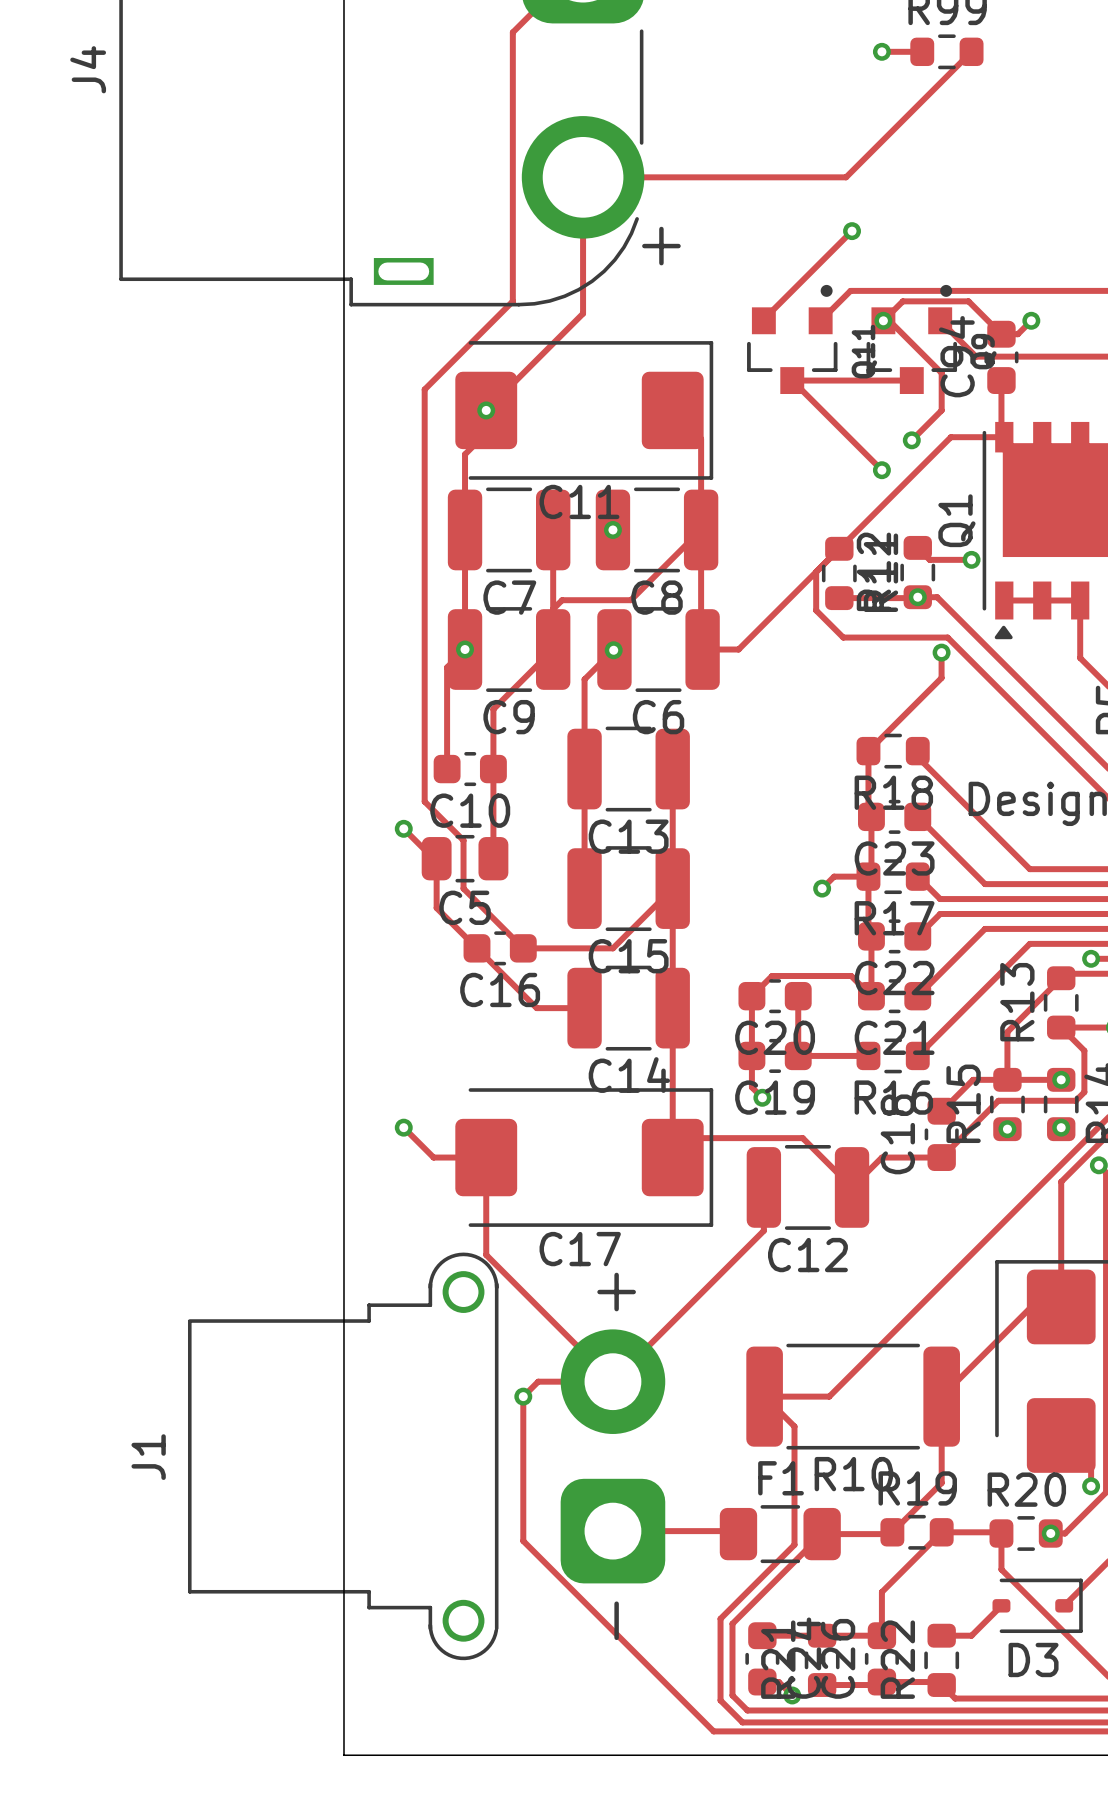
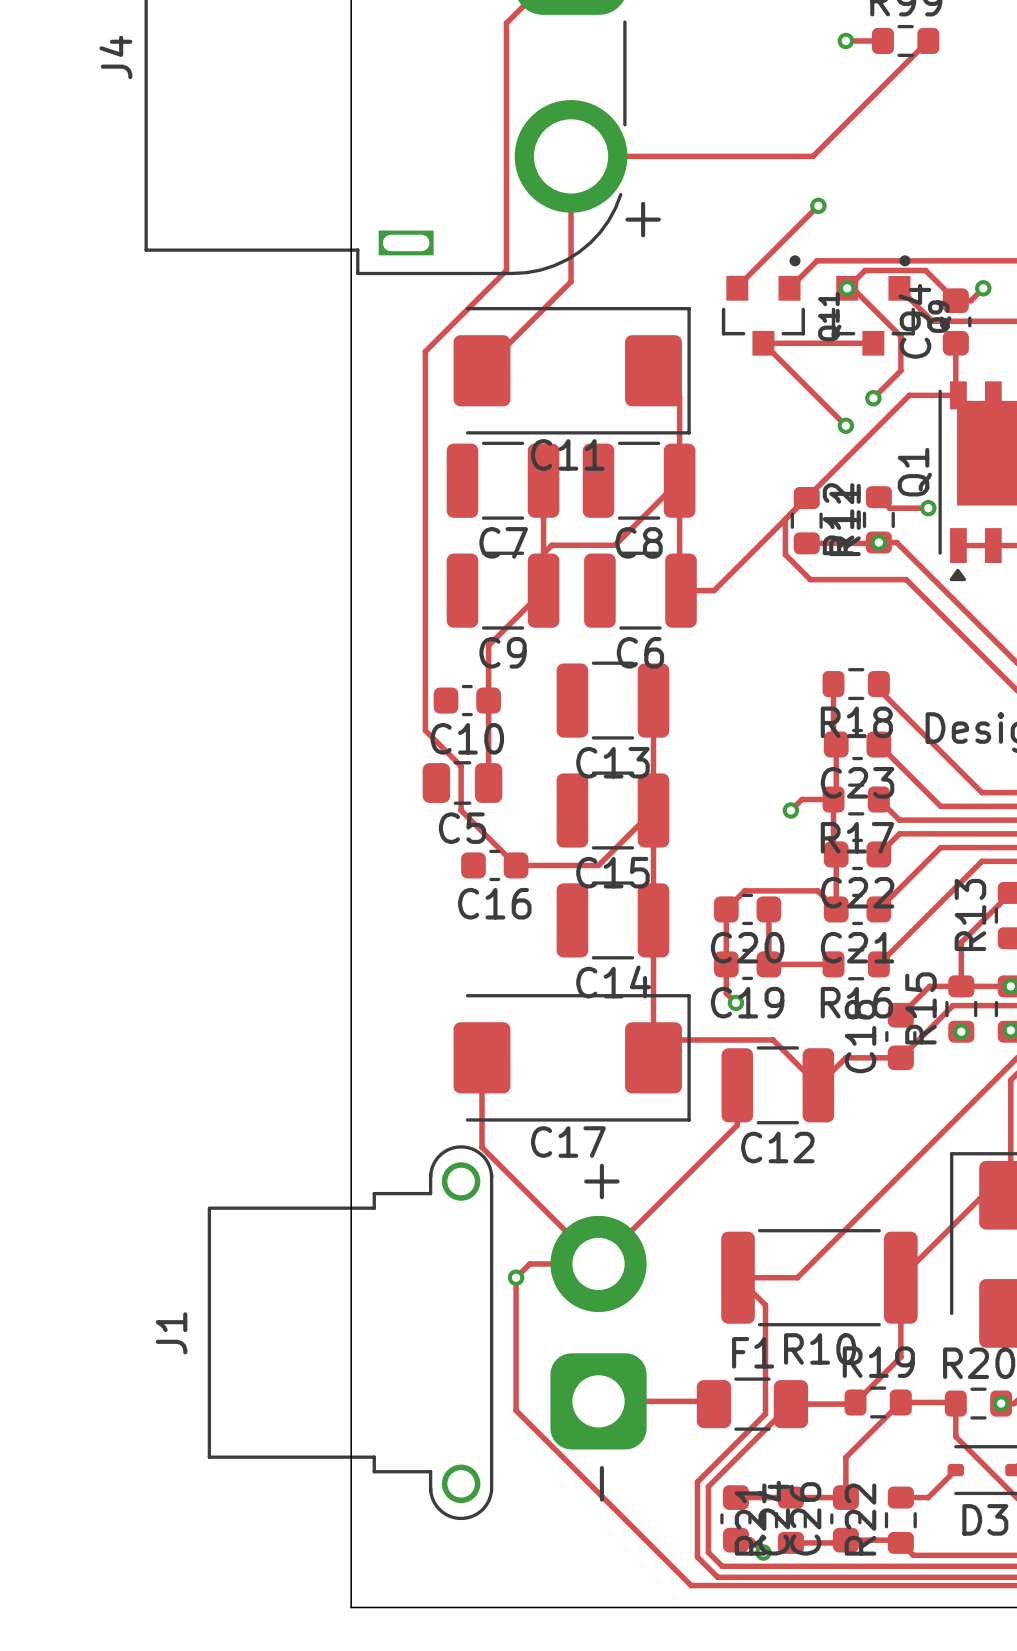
track: (486, 410) (486, 433) (465, 454) (465, 649) (447, 667) (447, 769) -> none
via: (486, 410) -> none
via: (612, 529) -> none
via: (465, 649) -> none
track: (614, 649) (584, 679) (584, 888) -> none
via: (613, 650) -> none
track: (941, 652) (941, 678) (868, 751) -> none
via: (941, 652) -> none
track: (403, 828) (433, 858) (436, 858) (436, 908) (536, 1008) (584, 1008) -> none
via: (403, 828) -> none
track: (403, 1127) (433, 1157) (486, 1157) -> none
via: (403, 1127) -> none

